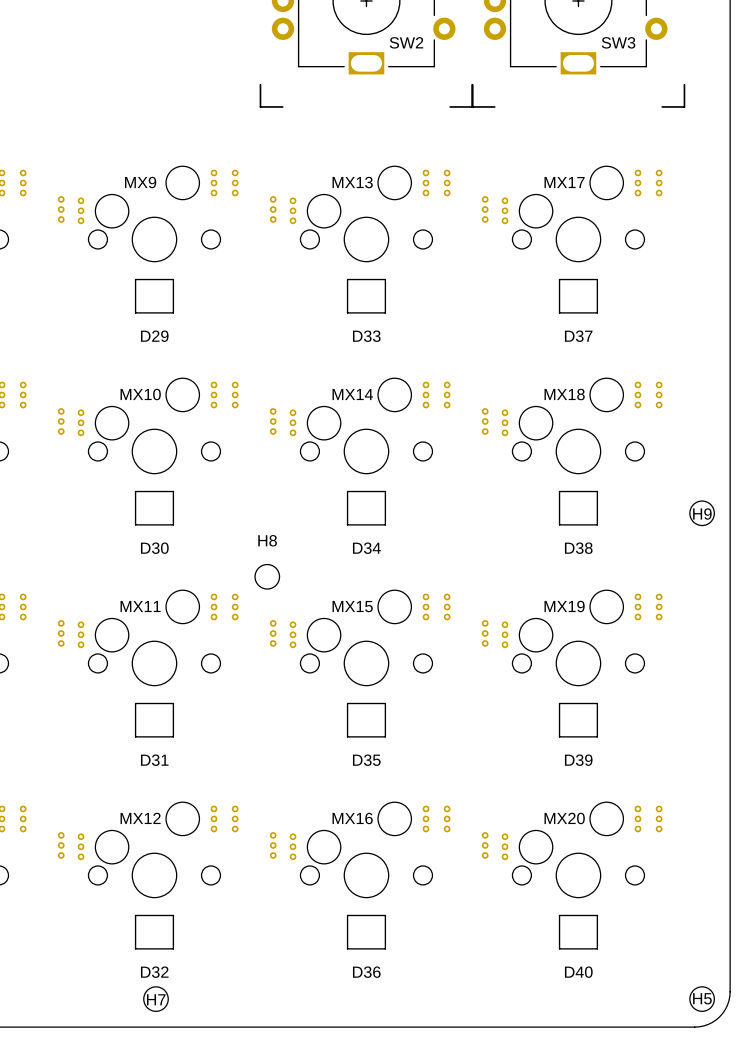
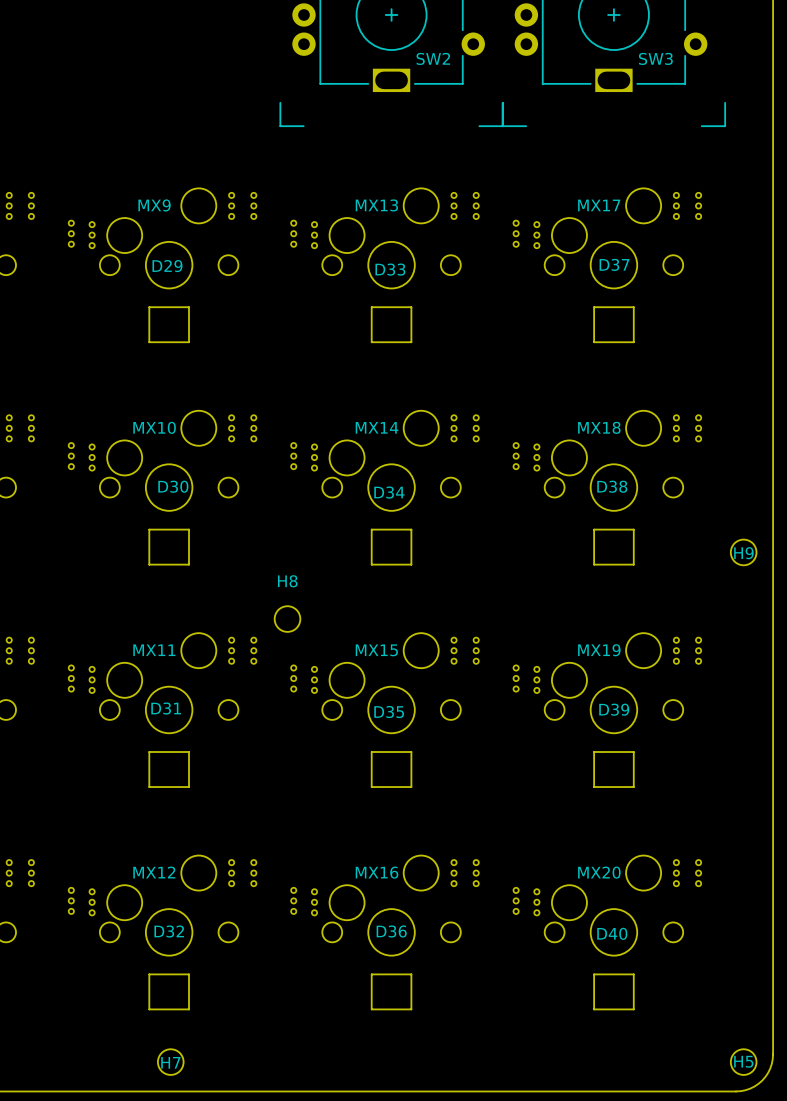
D29 name position: D29 (154, 336) -> D29 (167, 266)
D33 name position: D33 (366, 336) -> D33 (390, 269)
D37 name position: D37 (578, 336) -> D37 (614, 264)
D30 name position: D30 (154, 548) -> D30 (173, 486)
D34 name position: D34 (366, 548) -> D34 (389, 492)
D38 name position: D38 (578, 548) -> D38 (612, 486)
D31 name position: D31 (154, 760) -> D31 (166, 708)
D35 name position: D35 (366, 760) -> D35 (389, 712)
D39 name position: D39 (578, 760) -> D39 (614, 709)
D32 name position: D32 (154, 972) -> D32 (169, 931)
D36 name position: D36 (366, 972) -> D36 (391, 931)
D40 name position: D40 (578, 972) -> D40 (612, 933)

